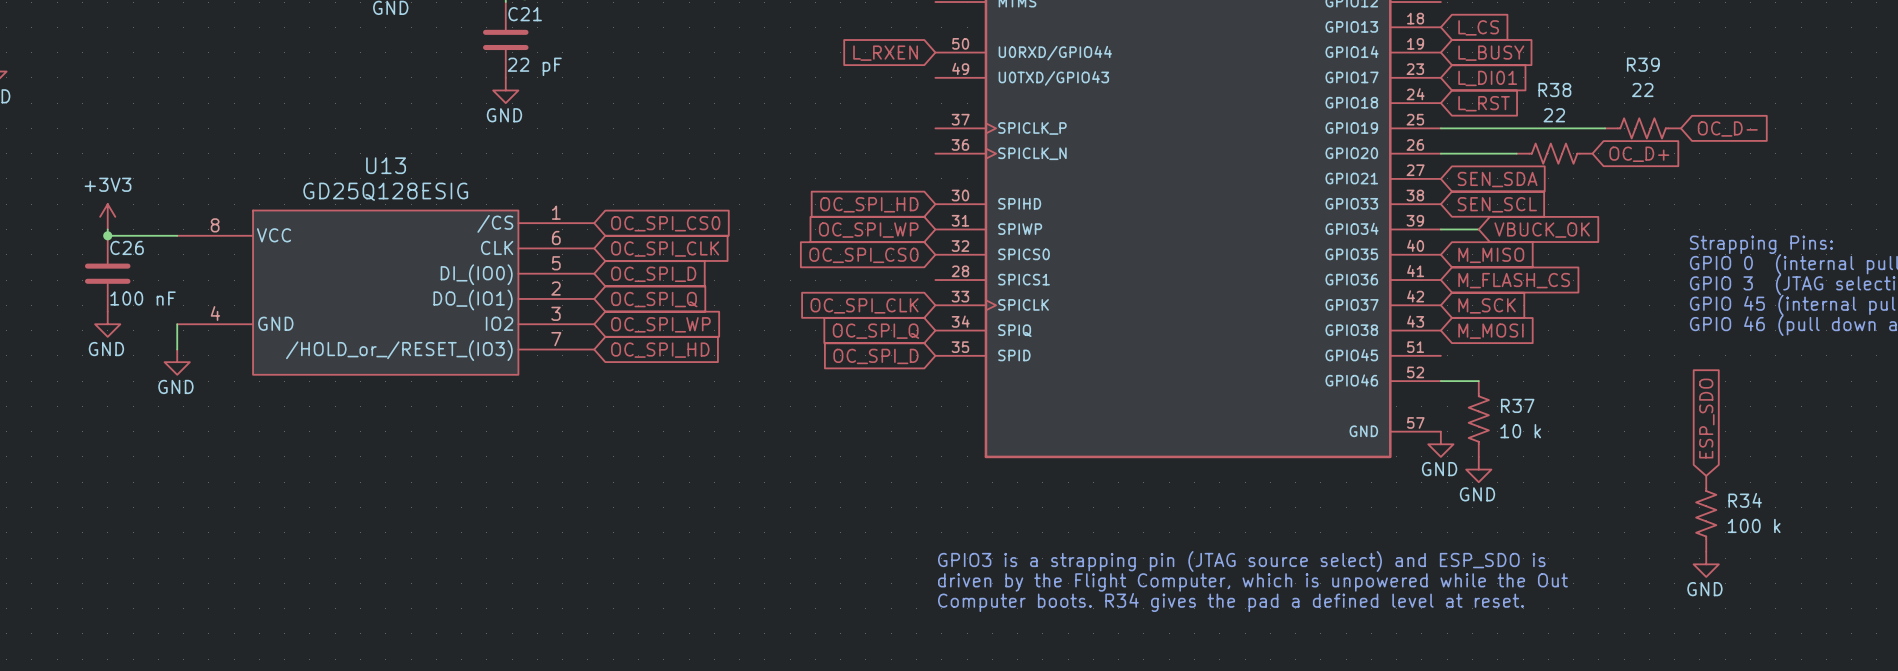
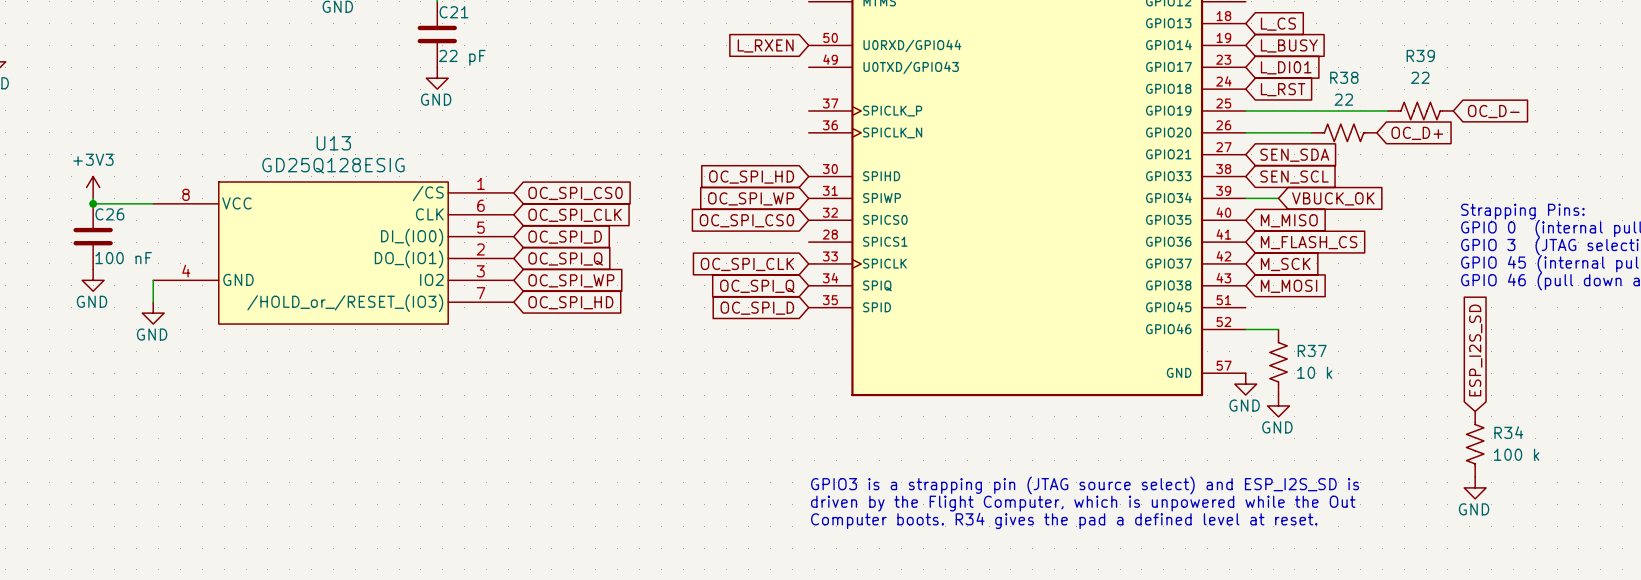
global label: ESP_SDO (1706, 418) -> ESP_I2S_SD (1475, 350)
text: GPIO3 is a strapping pin (JTAG source select) and ESP_SDO is (1241, 561) -> GPIO3 is a strapping pin (JTAG source select) and ESP_I2S_SD is (1085, 485)

